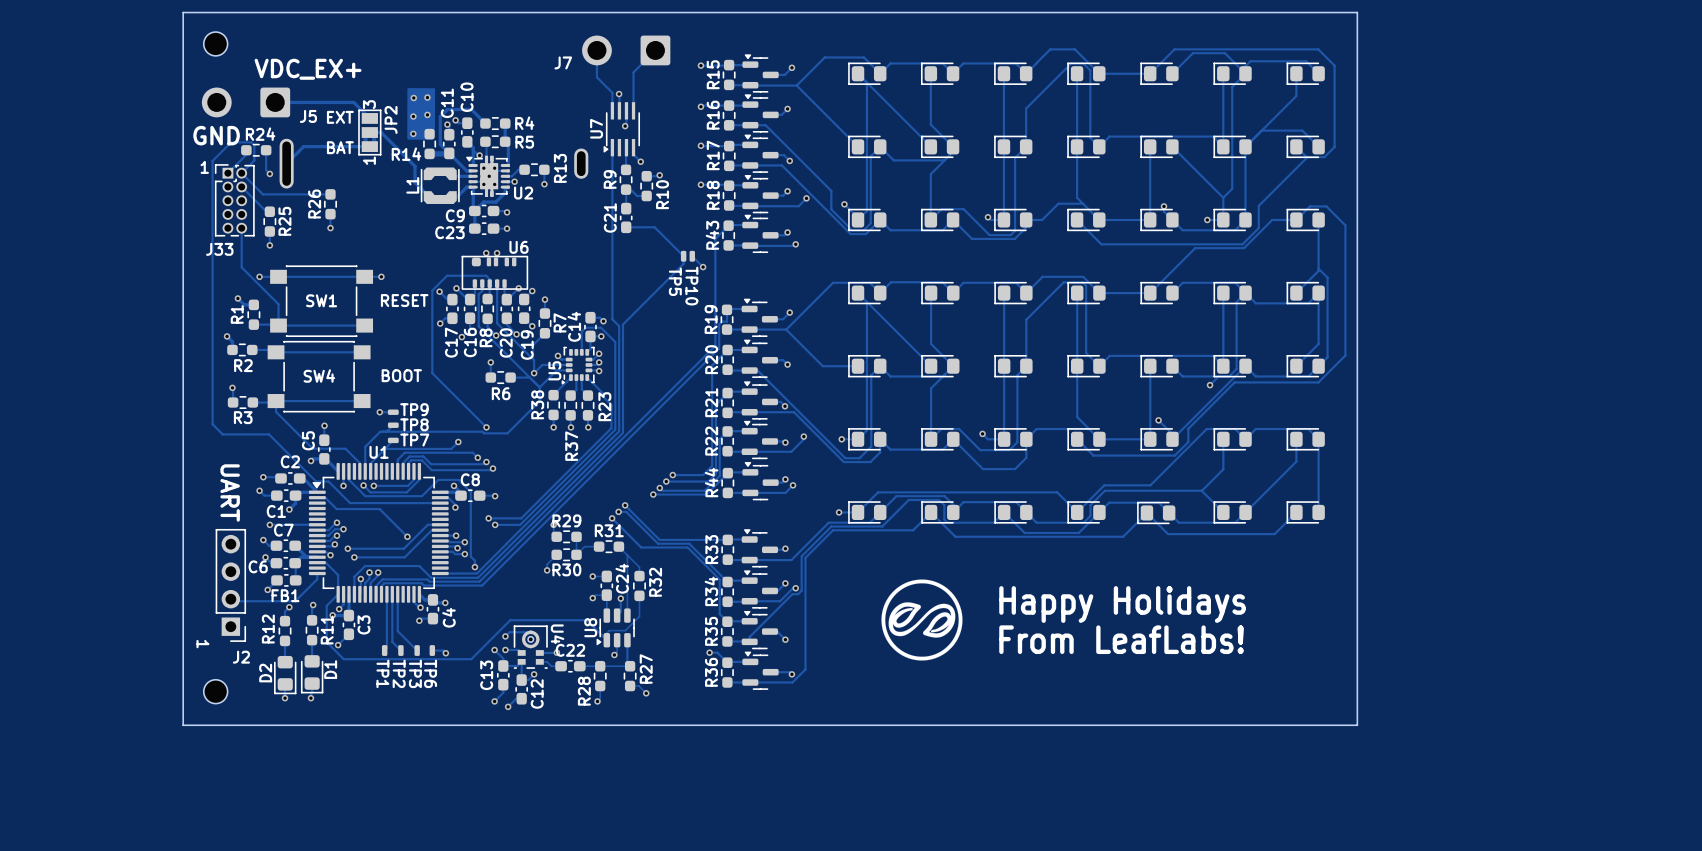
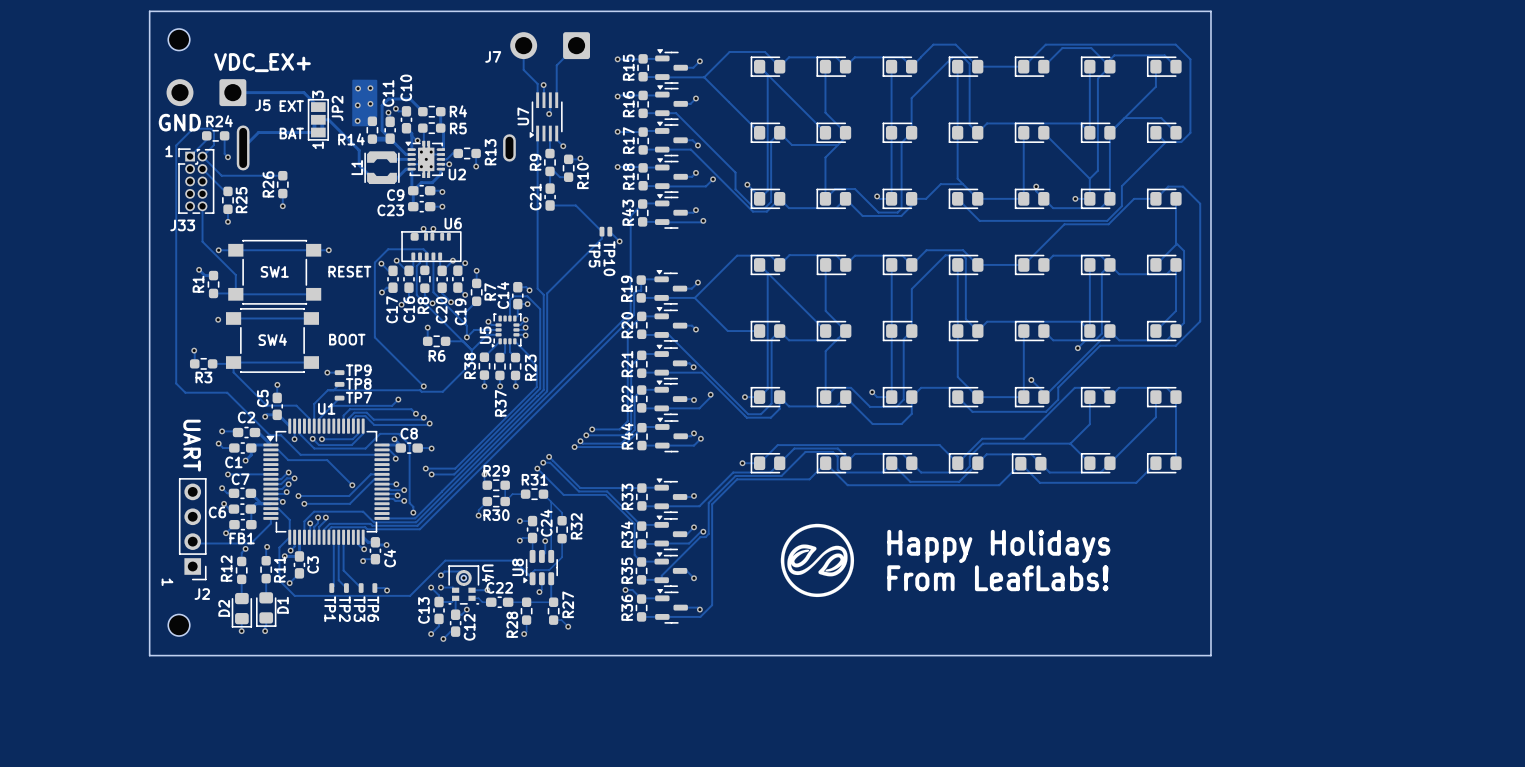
track: (227, 336) (232, 341) (232, 349) -> none
via position: (227, 336) -> (218, 319)
R2: (242, 349) -> none
track: (252, 349) (273, 349) -> none

